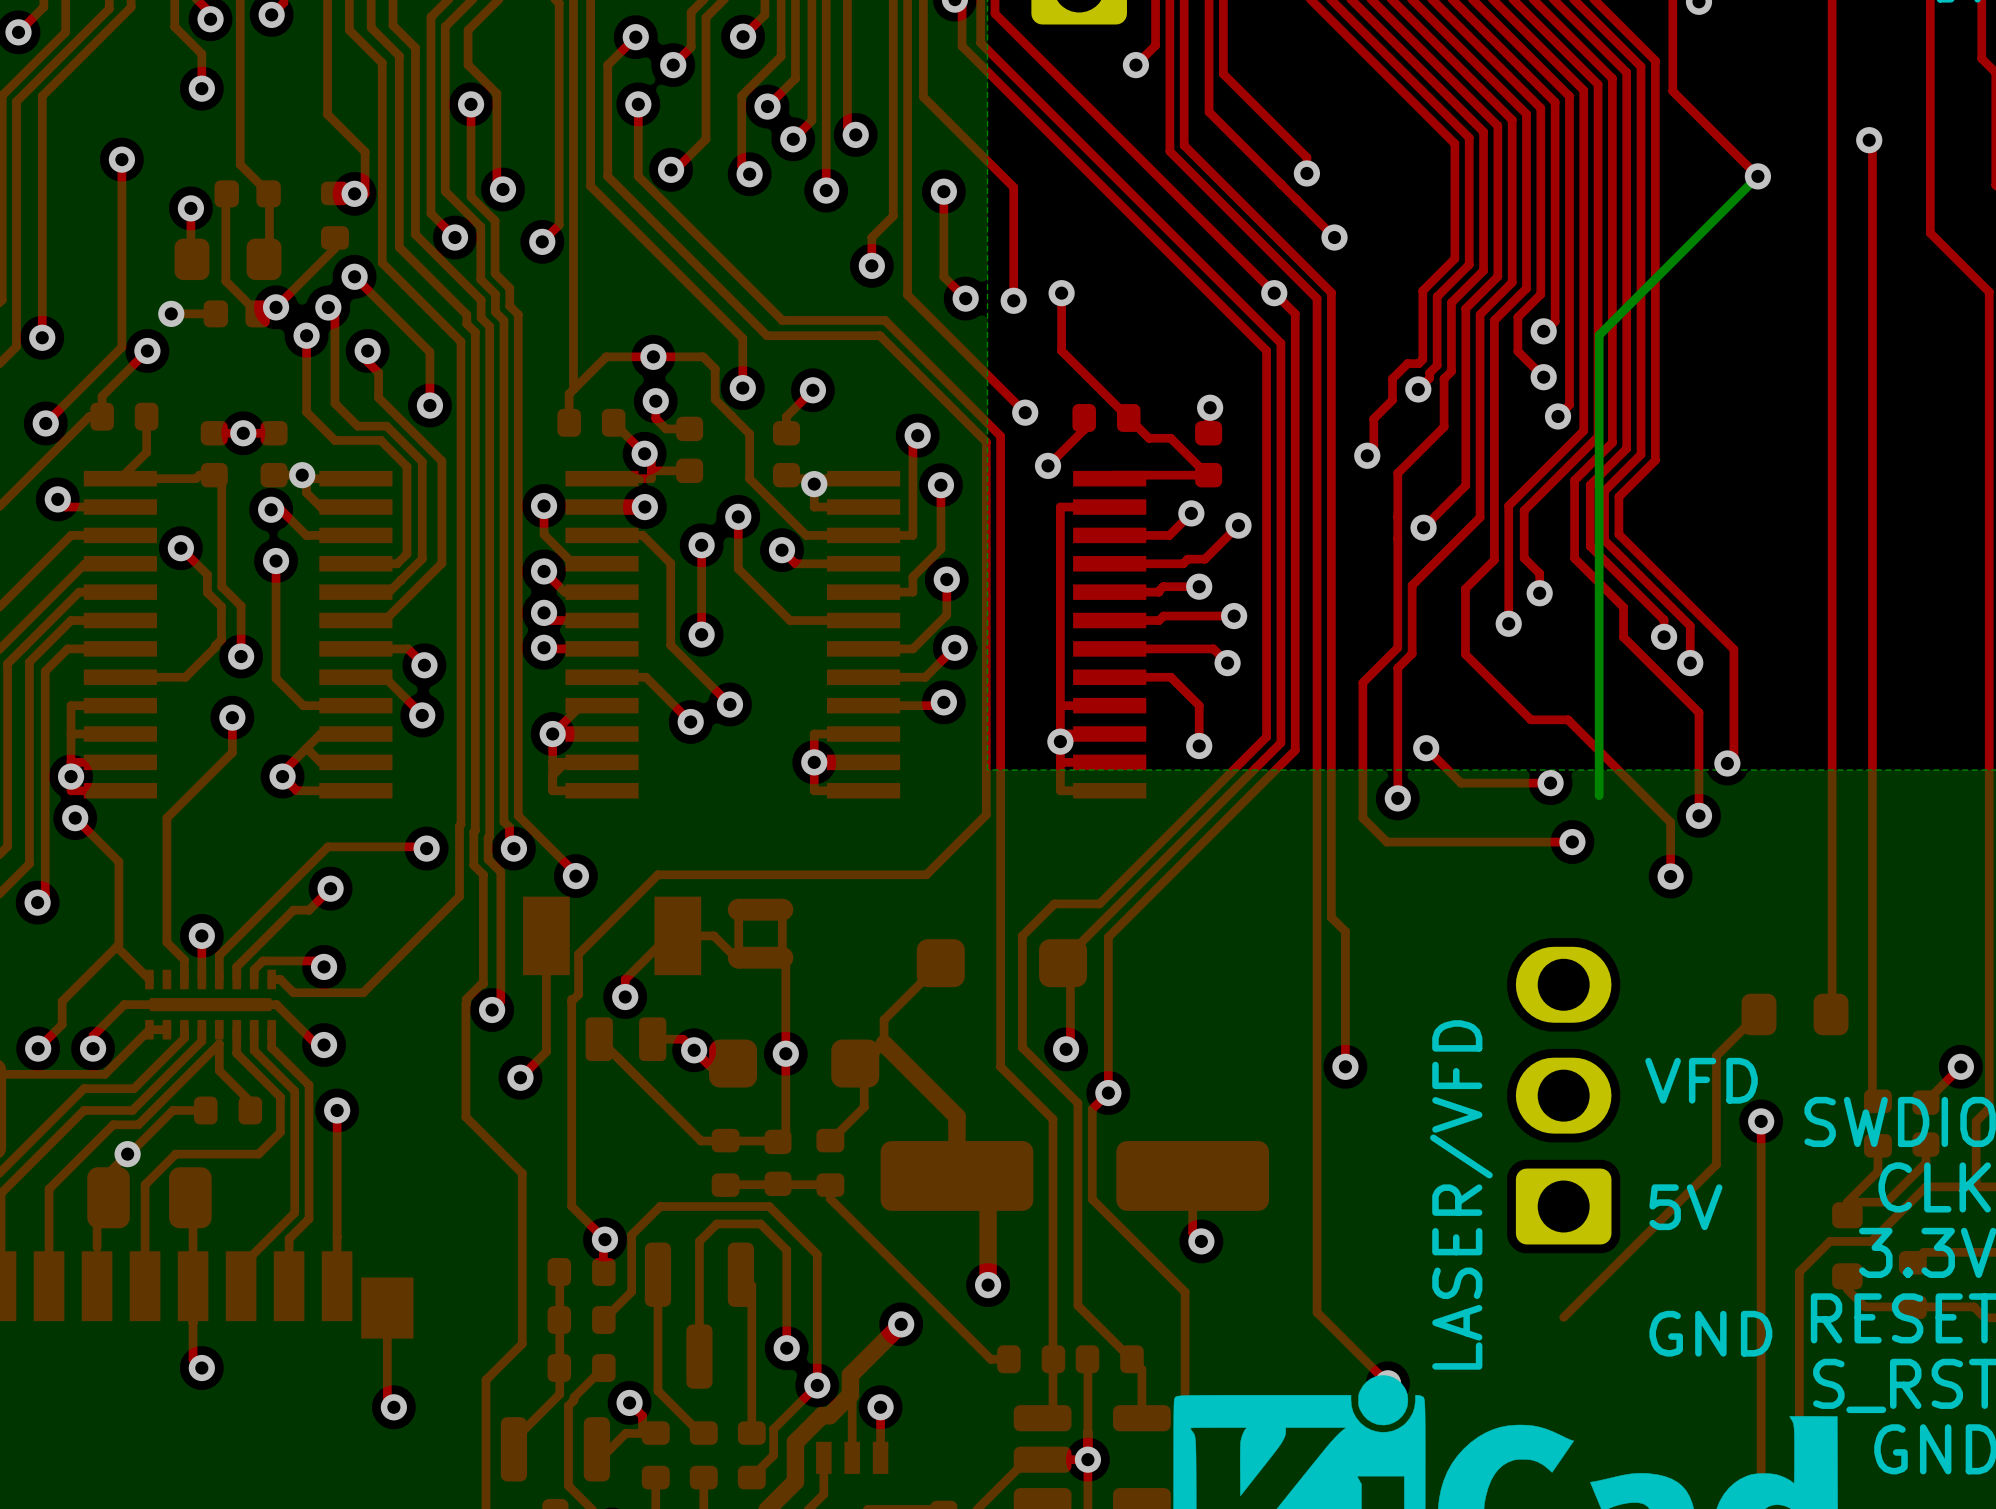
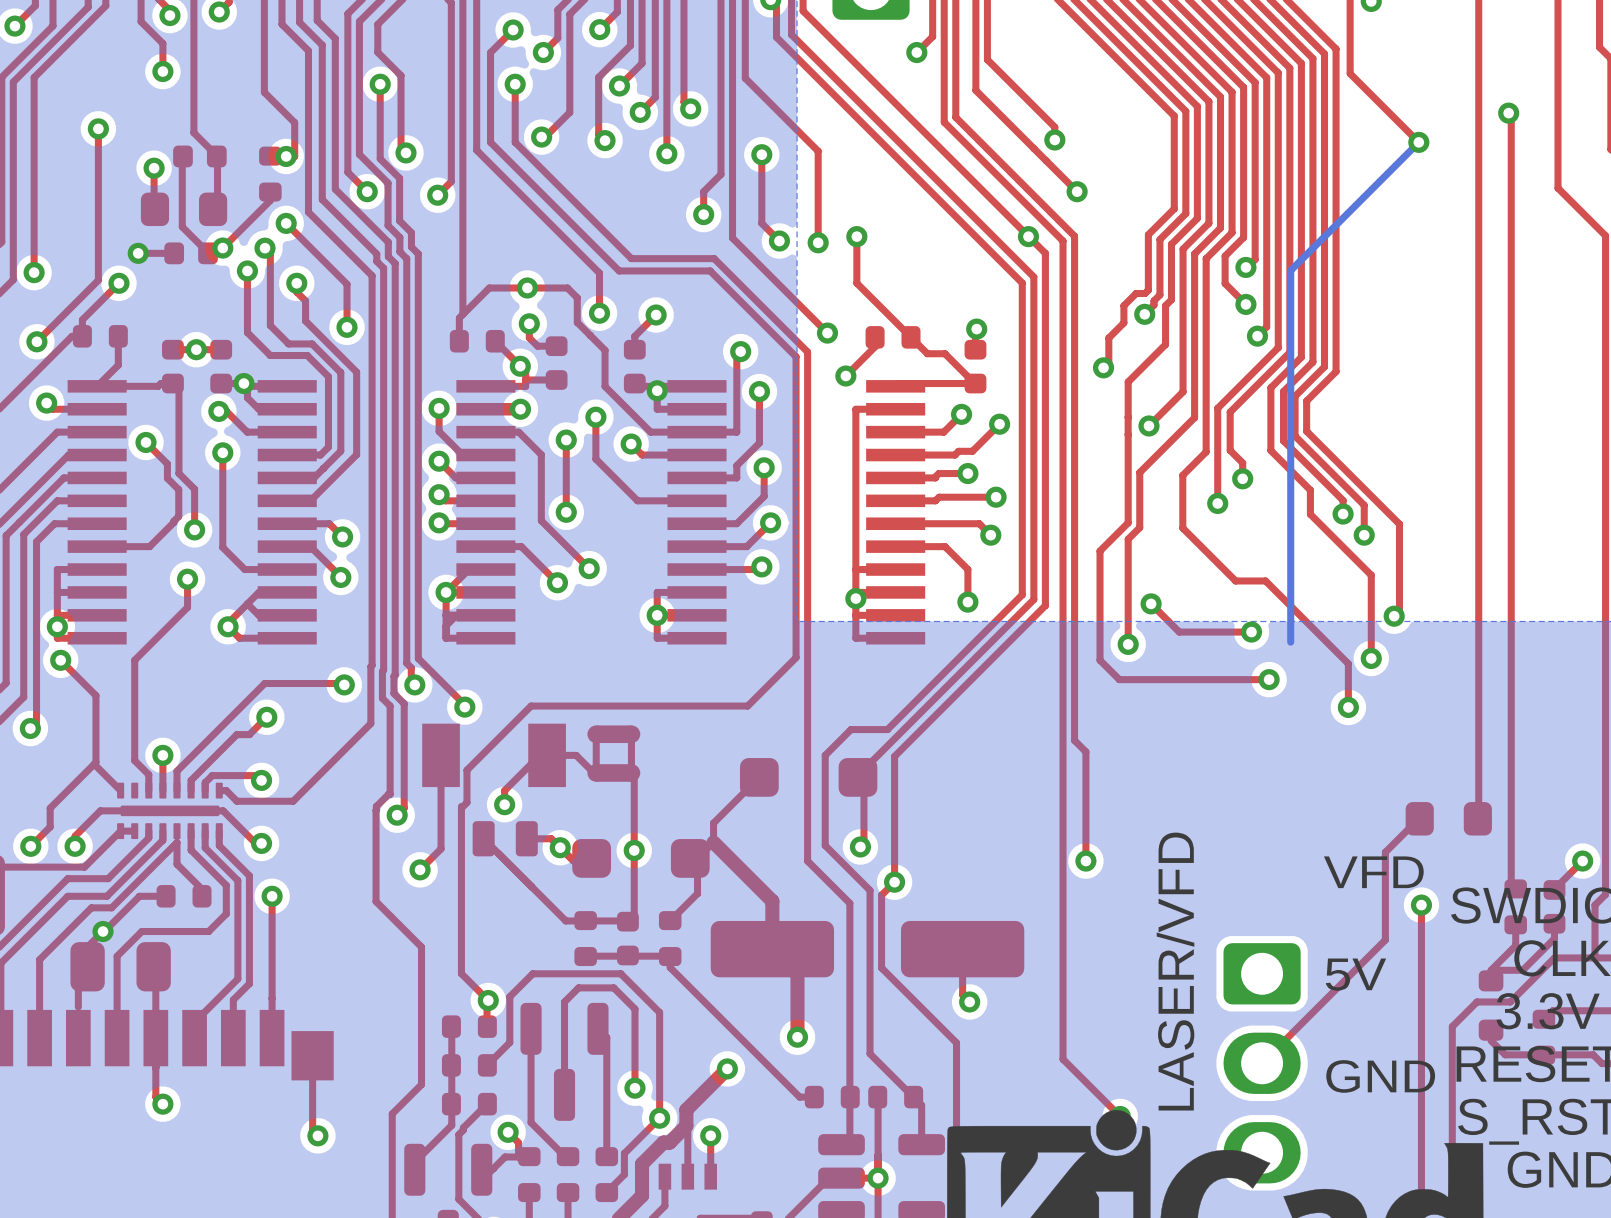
part rotation: 0° (1563, 1095) -> 180° (1262, 1063)
part position: (1563, 1095) -> (1262, 1063)

